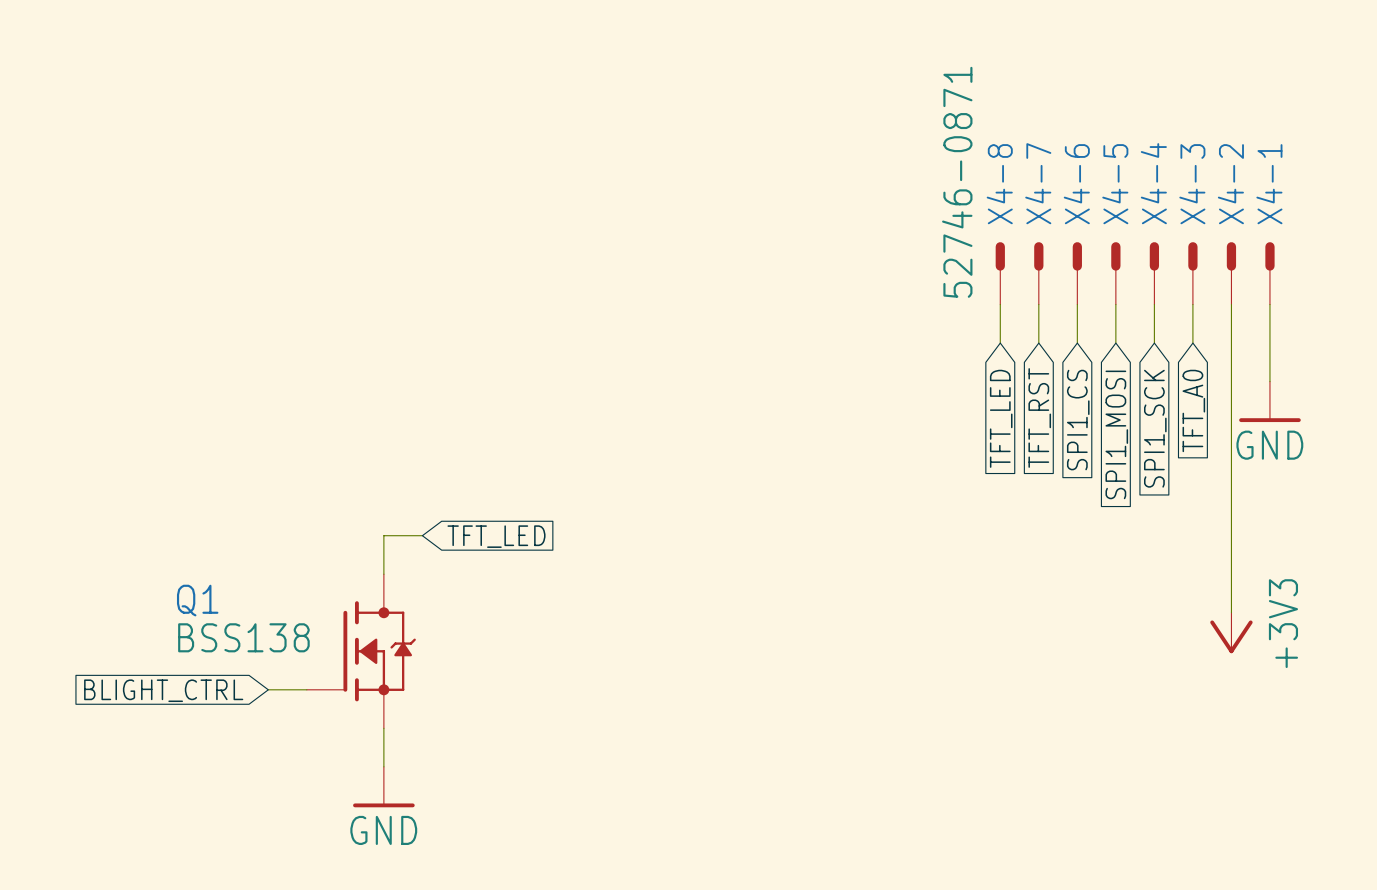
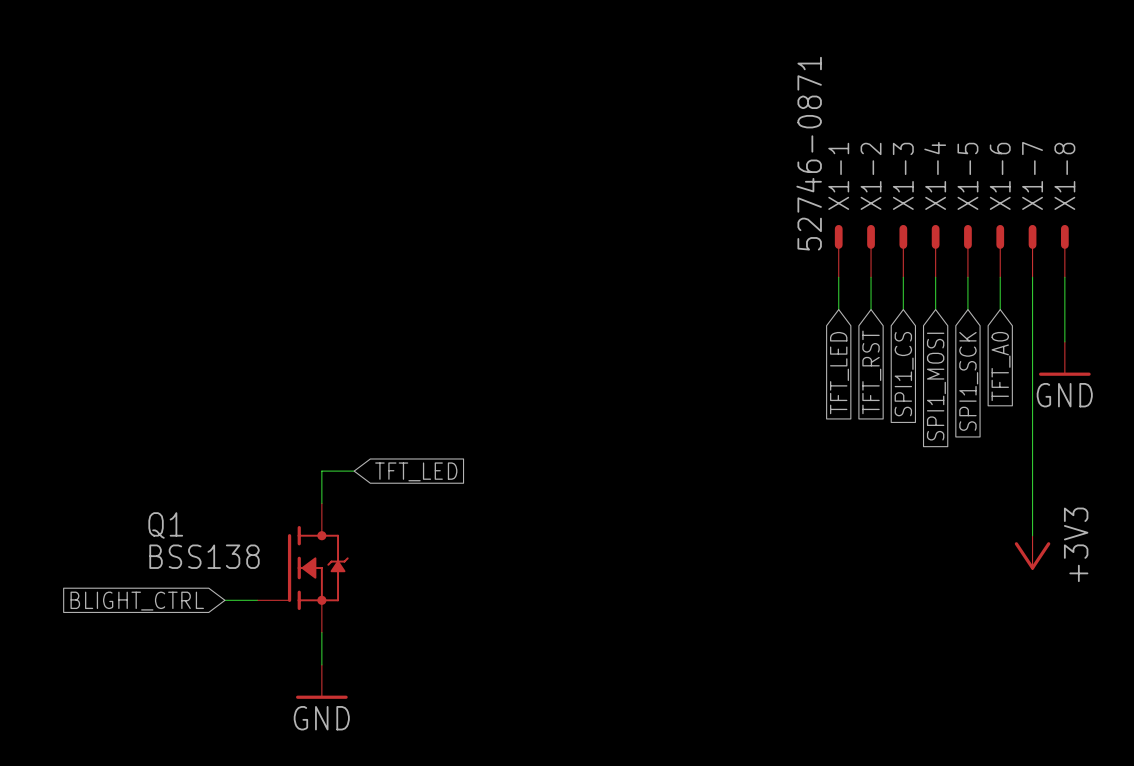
X4-8 value: none -> 52746-0871 (809, 153)
X4-1 value: 52746-0871 (957, 182) -> none
X4-7 name: X4-7 (1038, 183) -> X1-2 (871, 176)
X4-4 name: X4-4 (1153, 183) -> X1-5 (967, 176)
X4-8 name: X4-8 (999, 184) -> X1-1 (838, 176)
X4-6 name: X4-6 (1076, 184) -> X1-3 (903, 176)
X4-5 name: X4-5 (1115, 184) -> X1-4 (935, 175)
X4-3 name: X4-3 (1192, 184) -> X1-6 (1000, 176)
X4-2 name: X4-2 (1230, 184) -> X1-7 (1032, 175)
X4-1 name: X4-1 (1269, 184) -> X1-8 (1064, 176)

